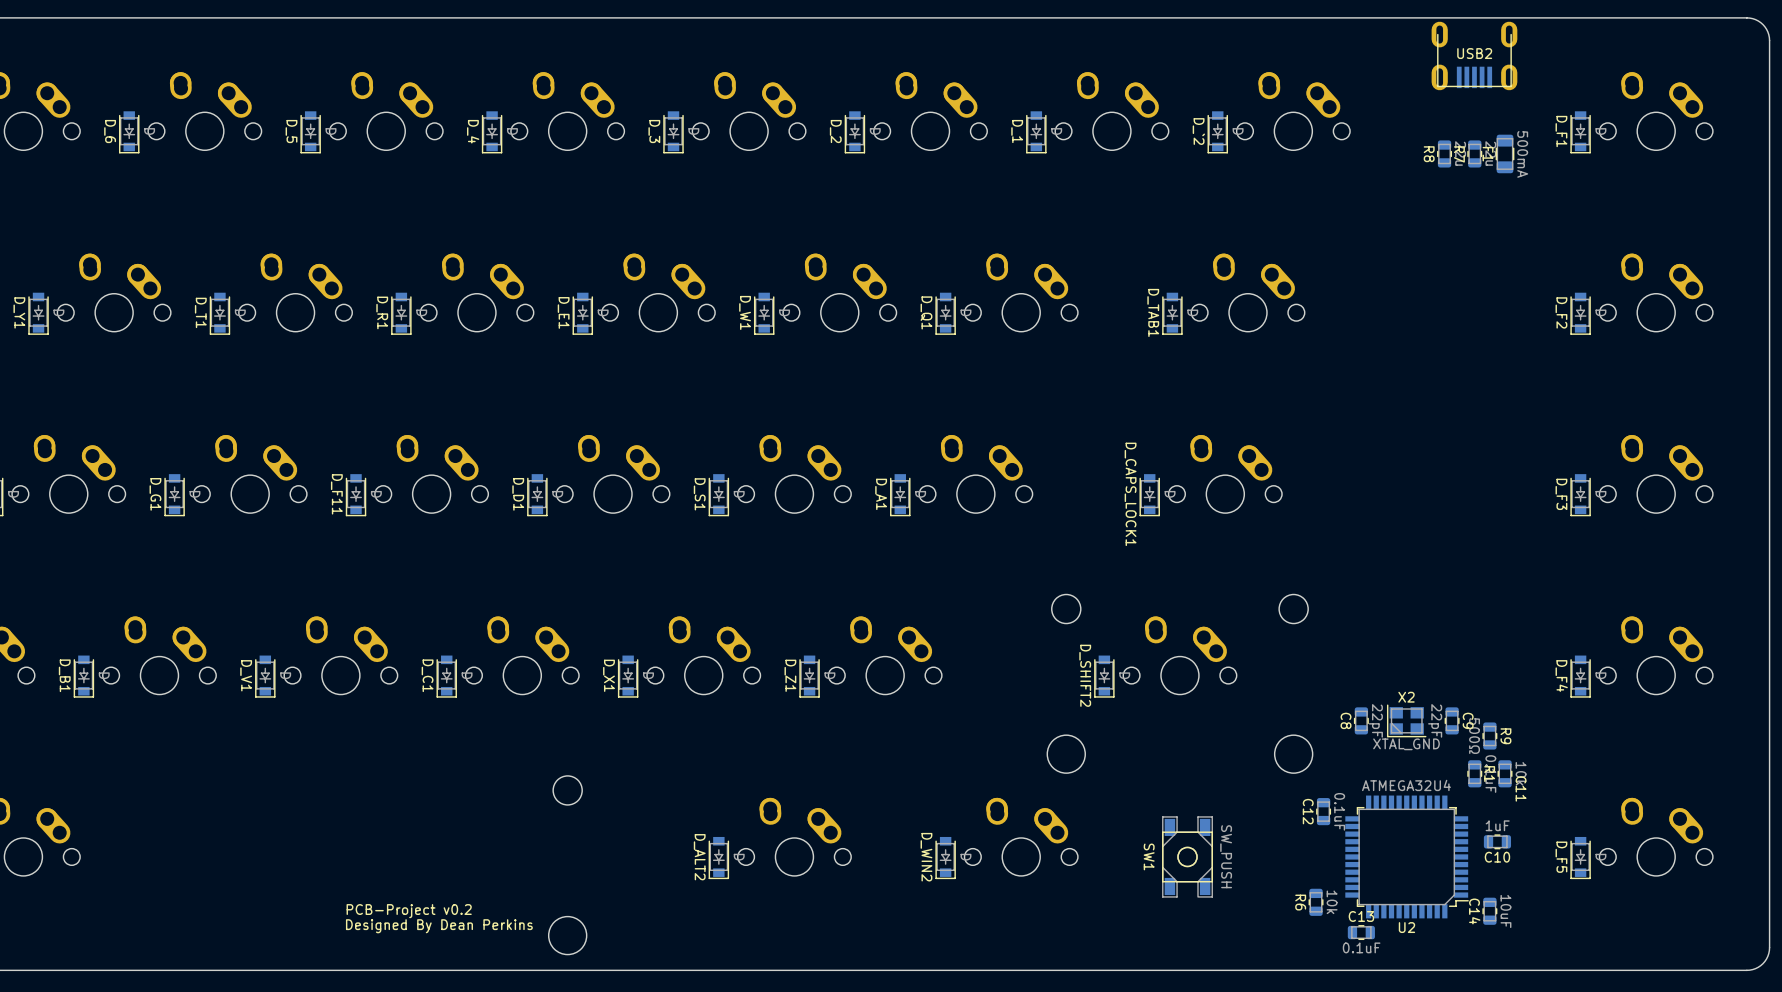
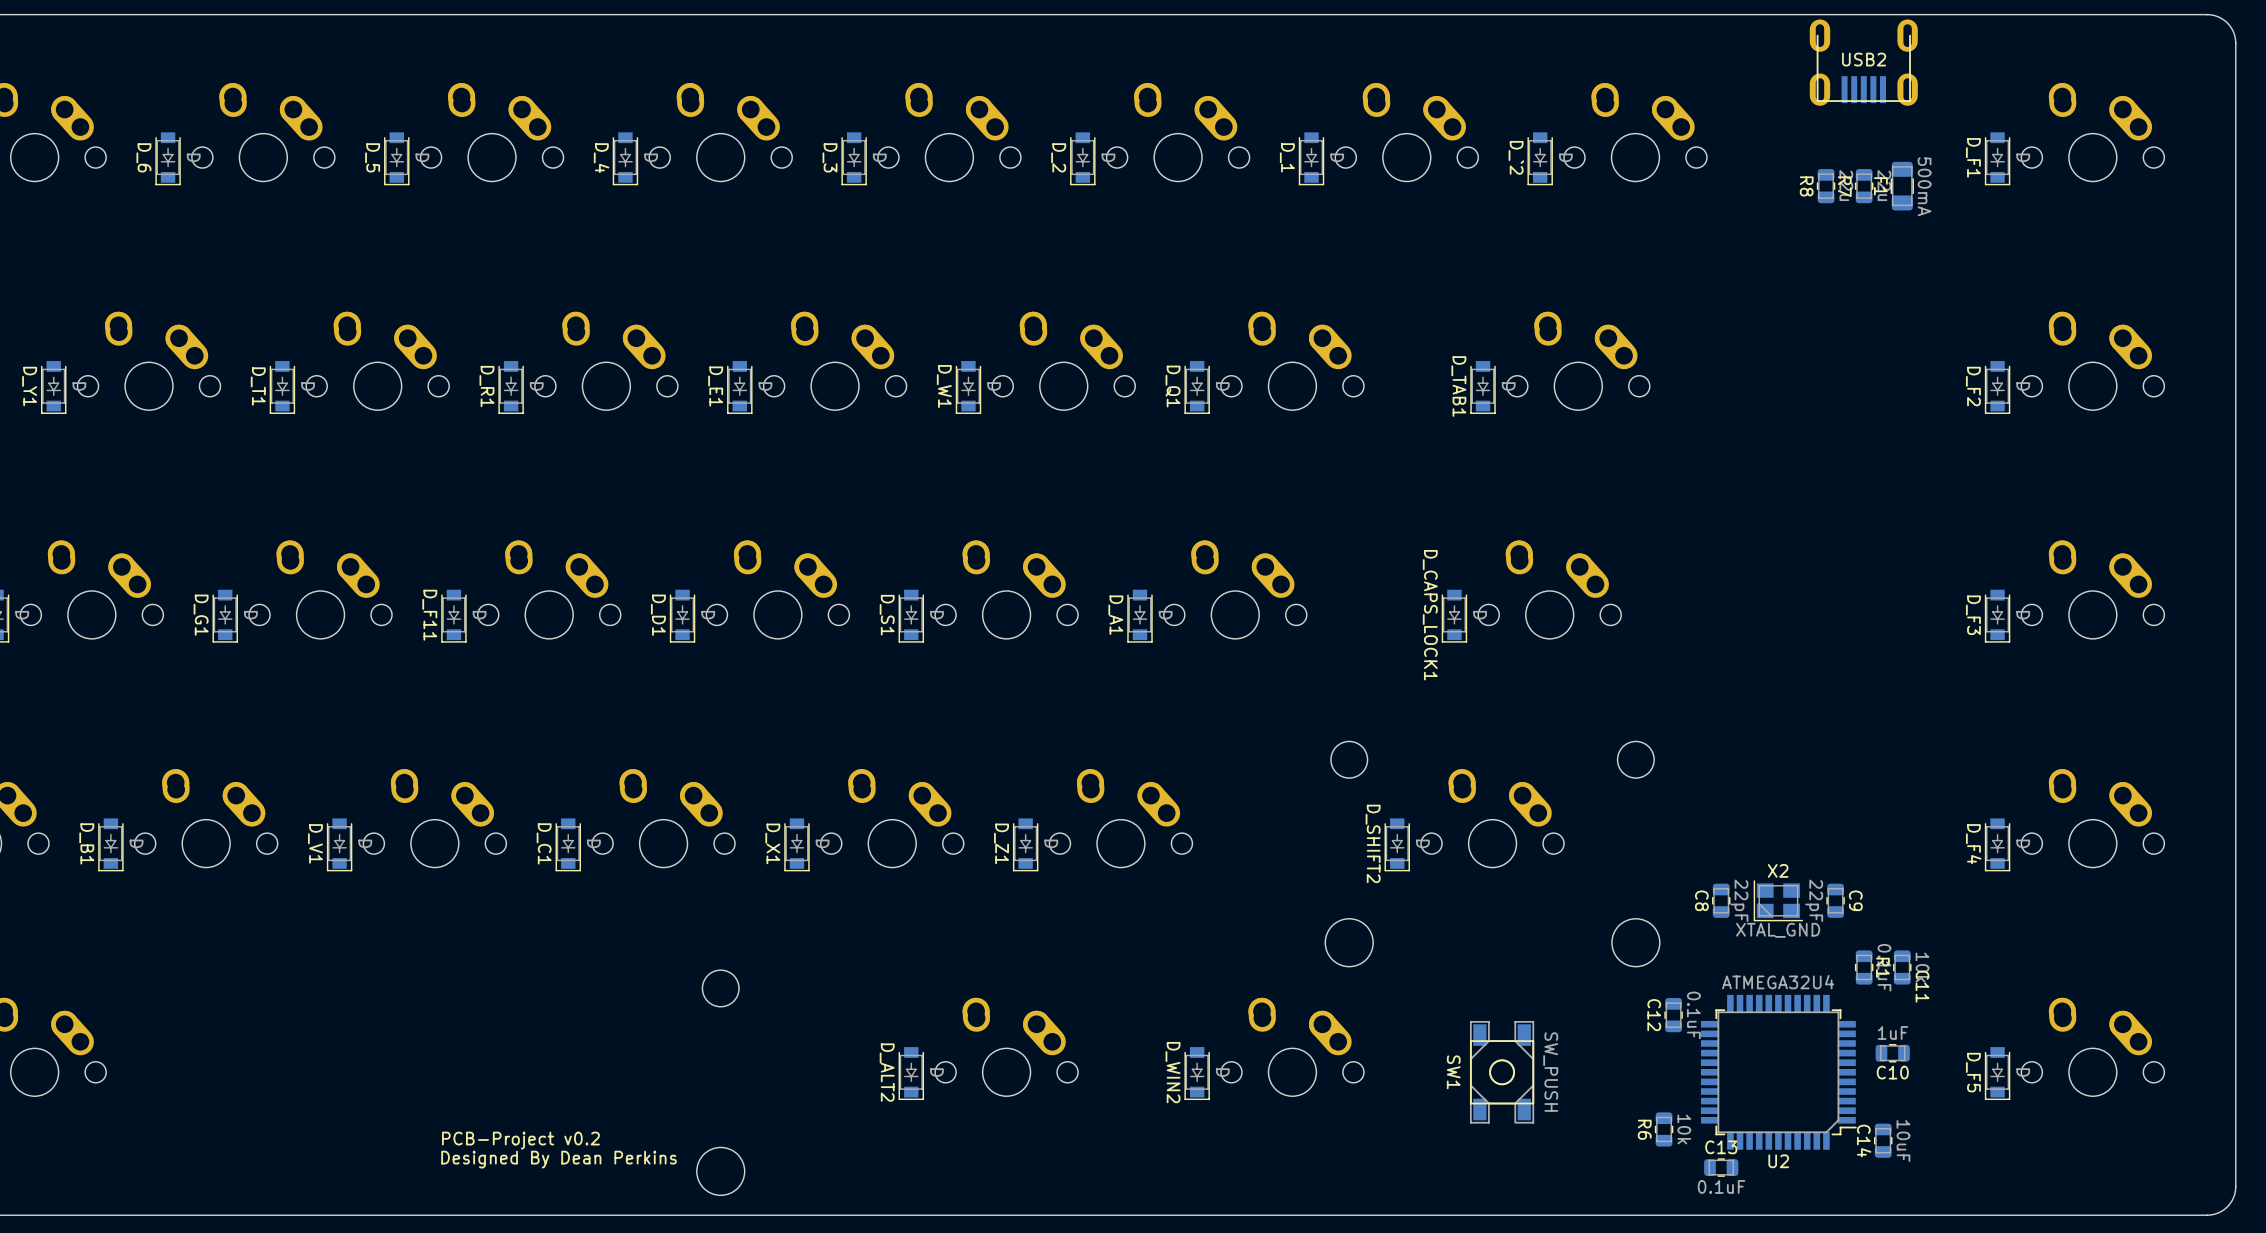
R9: 500Ω (1489, 736) -> none

